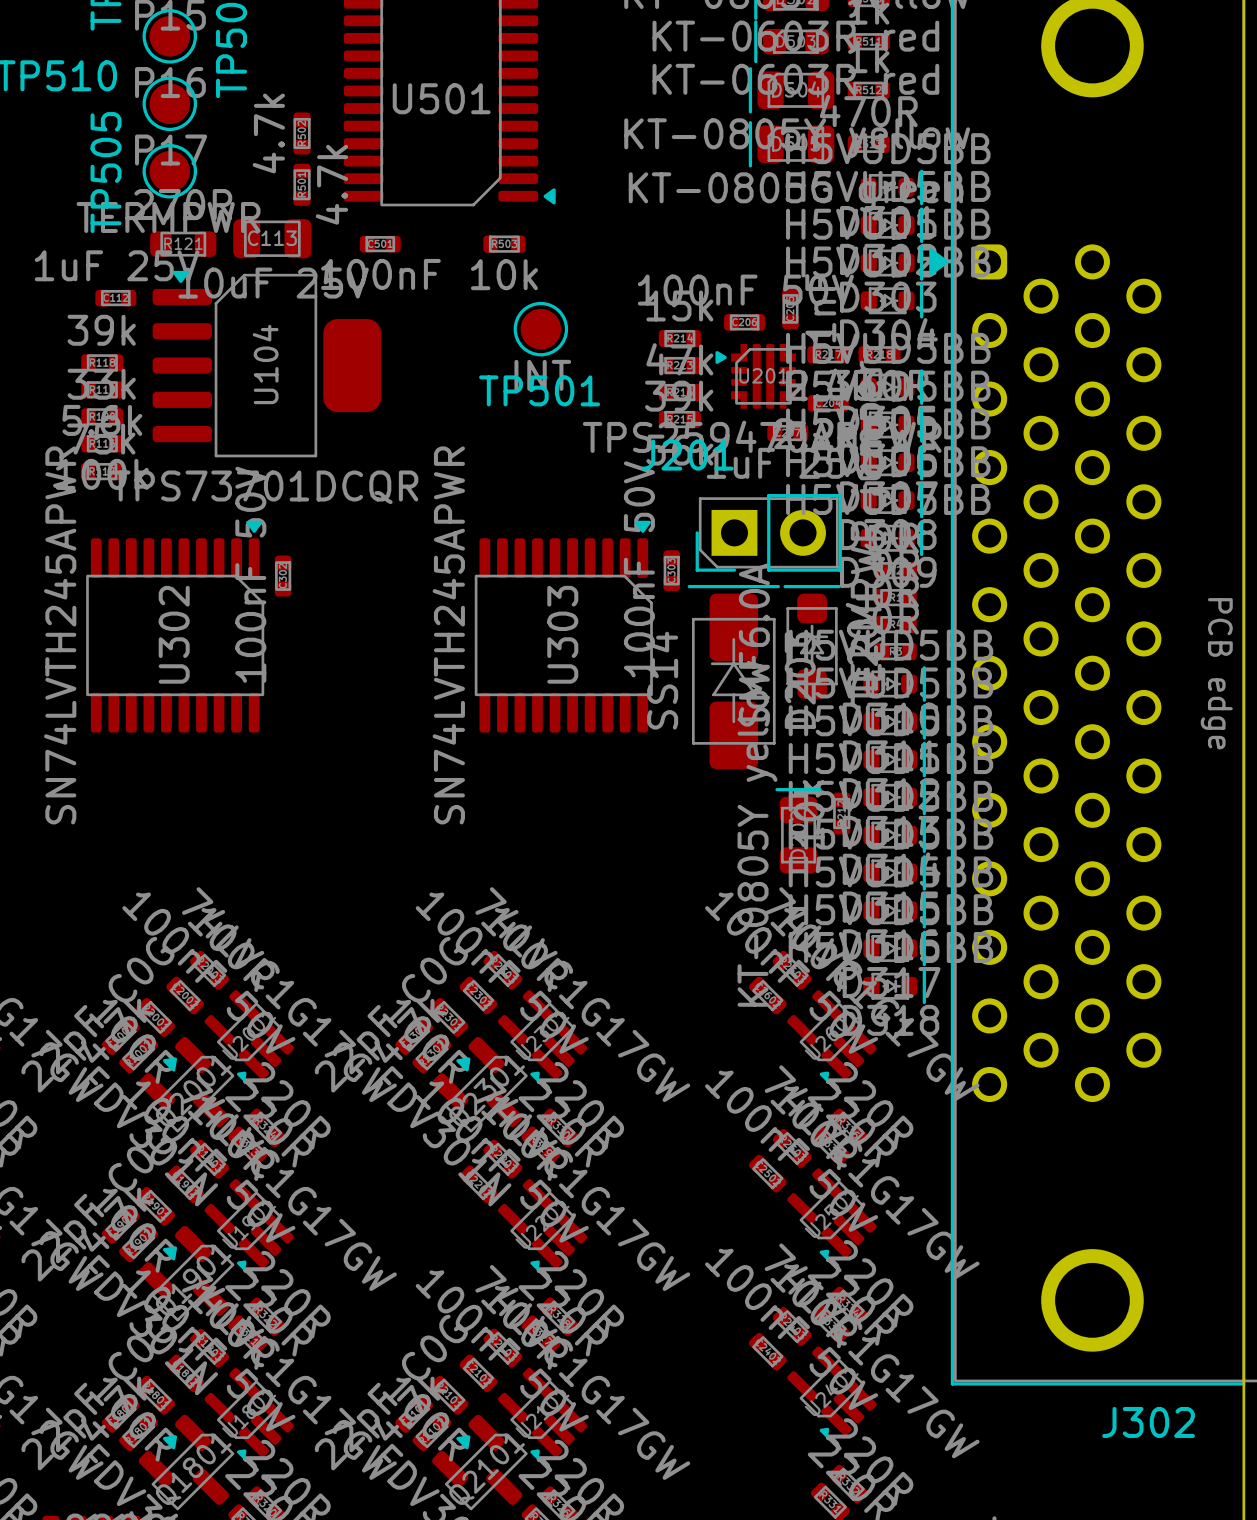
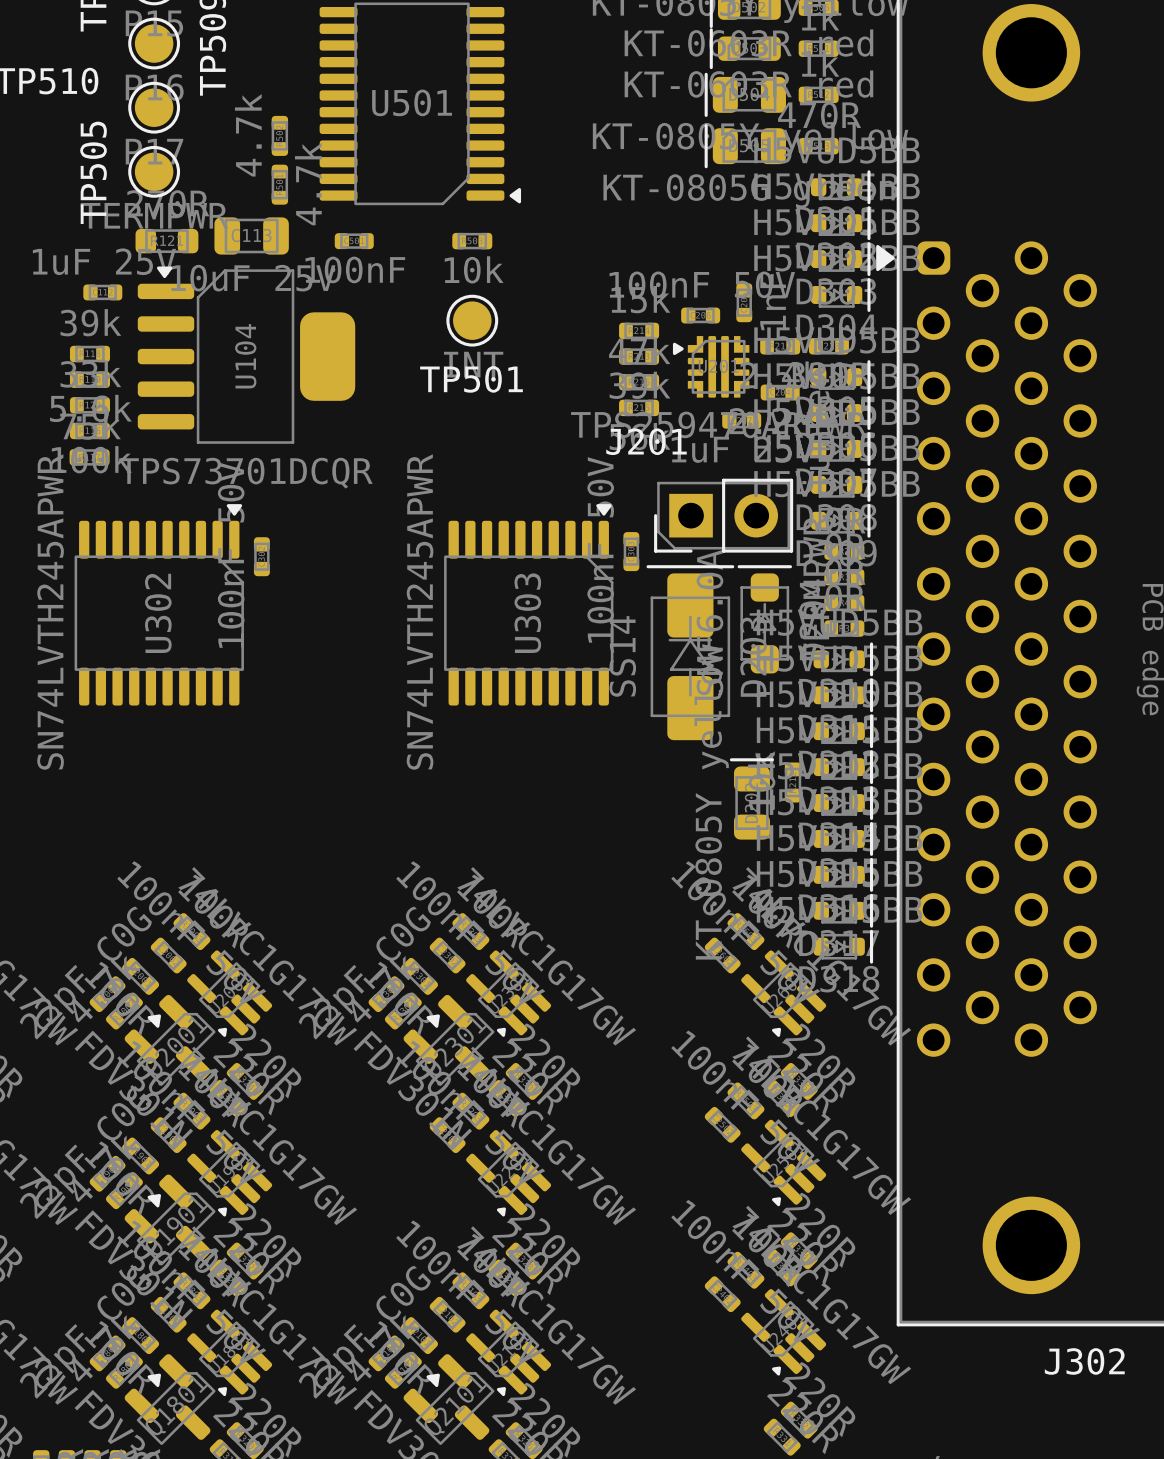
TP501 position: (540, 329) -> (472, 320)

